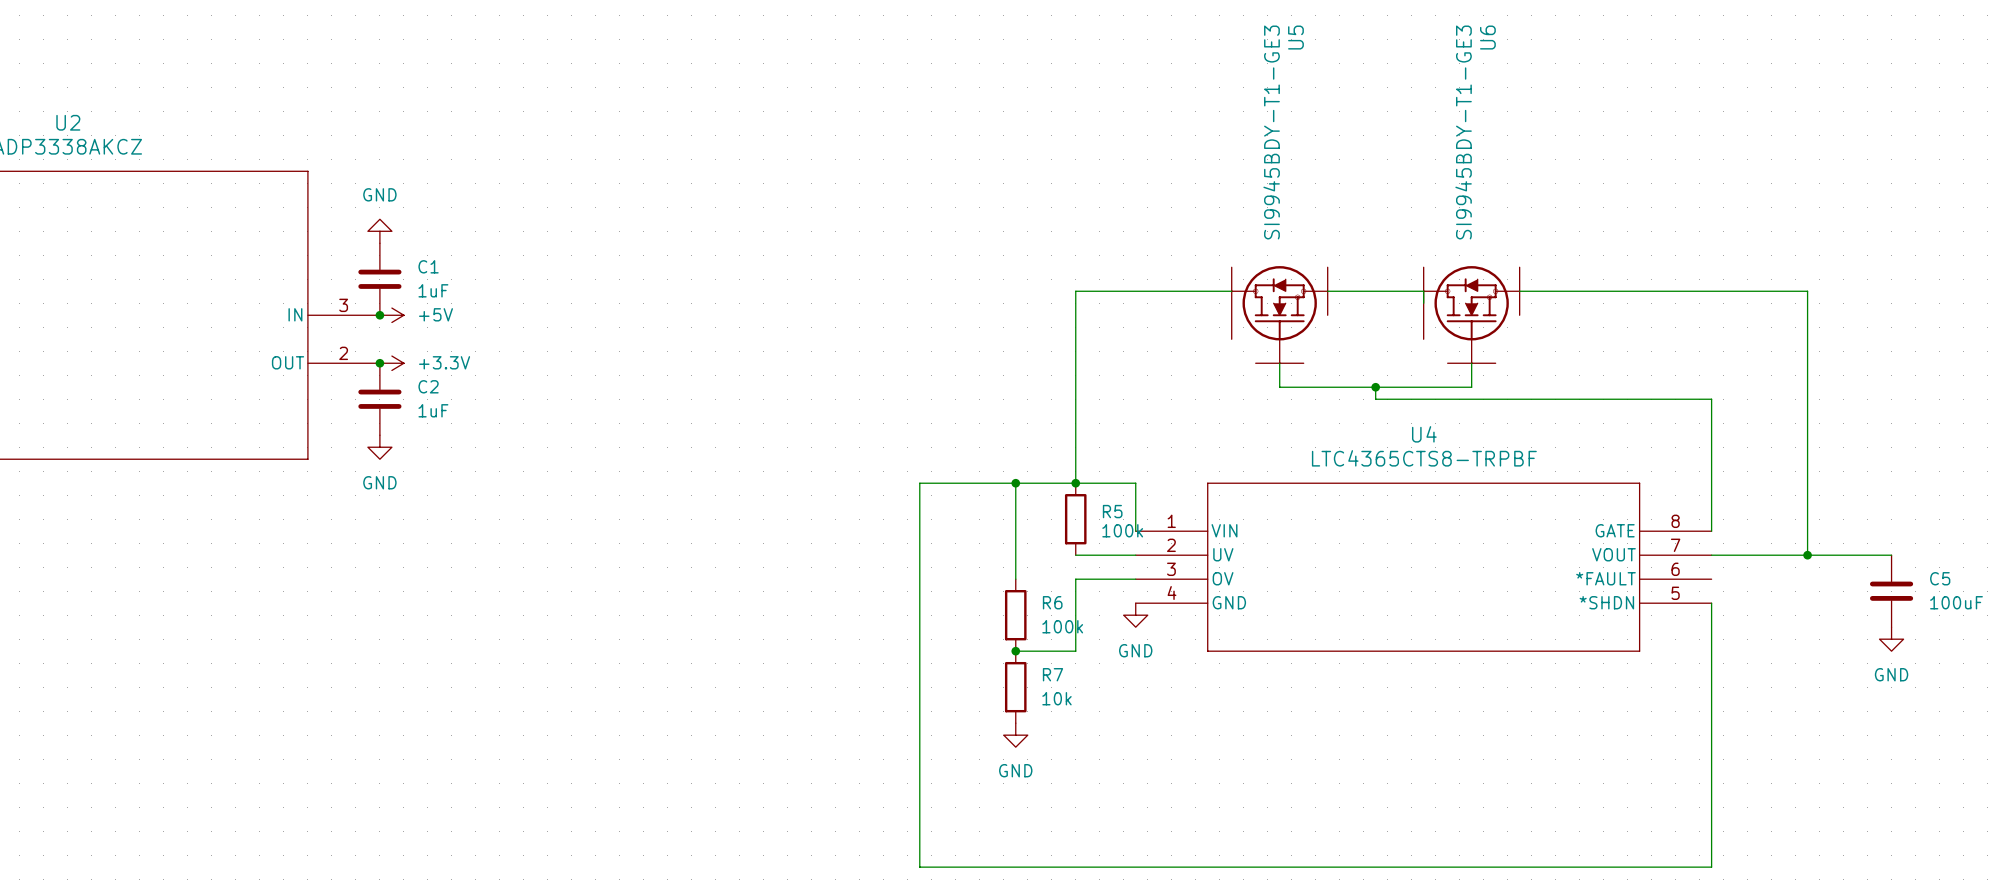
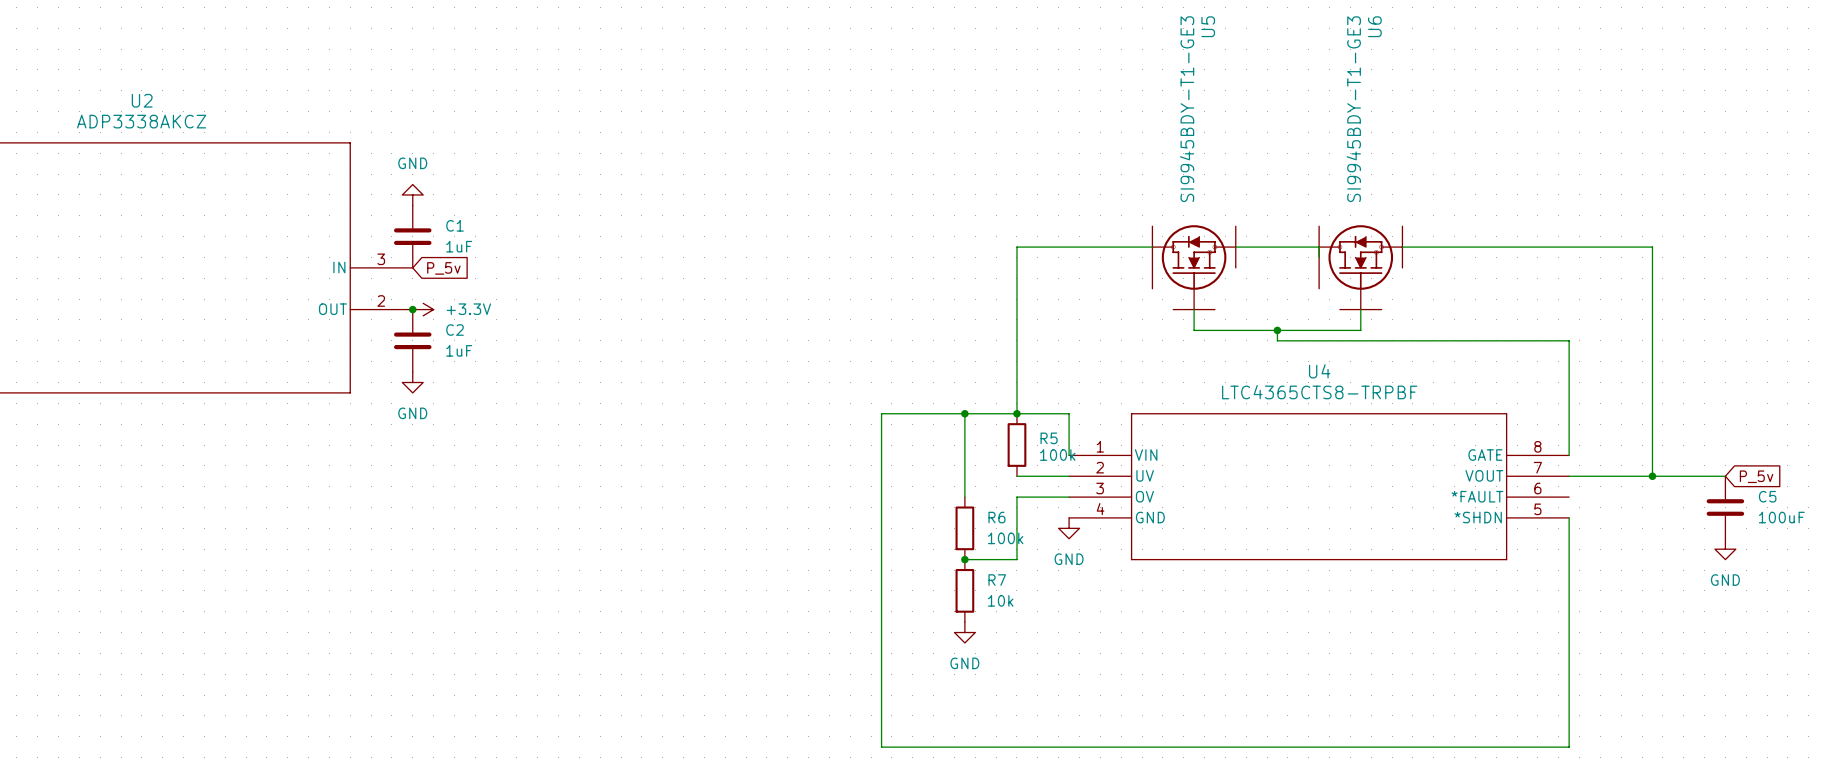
junction: (379, 315) -> none
power symbol: +5V (391, 315) -> none
global label: none -> P_5v (443, 268)
global label: none -> P_5v (1756, 476)

